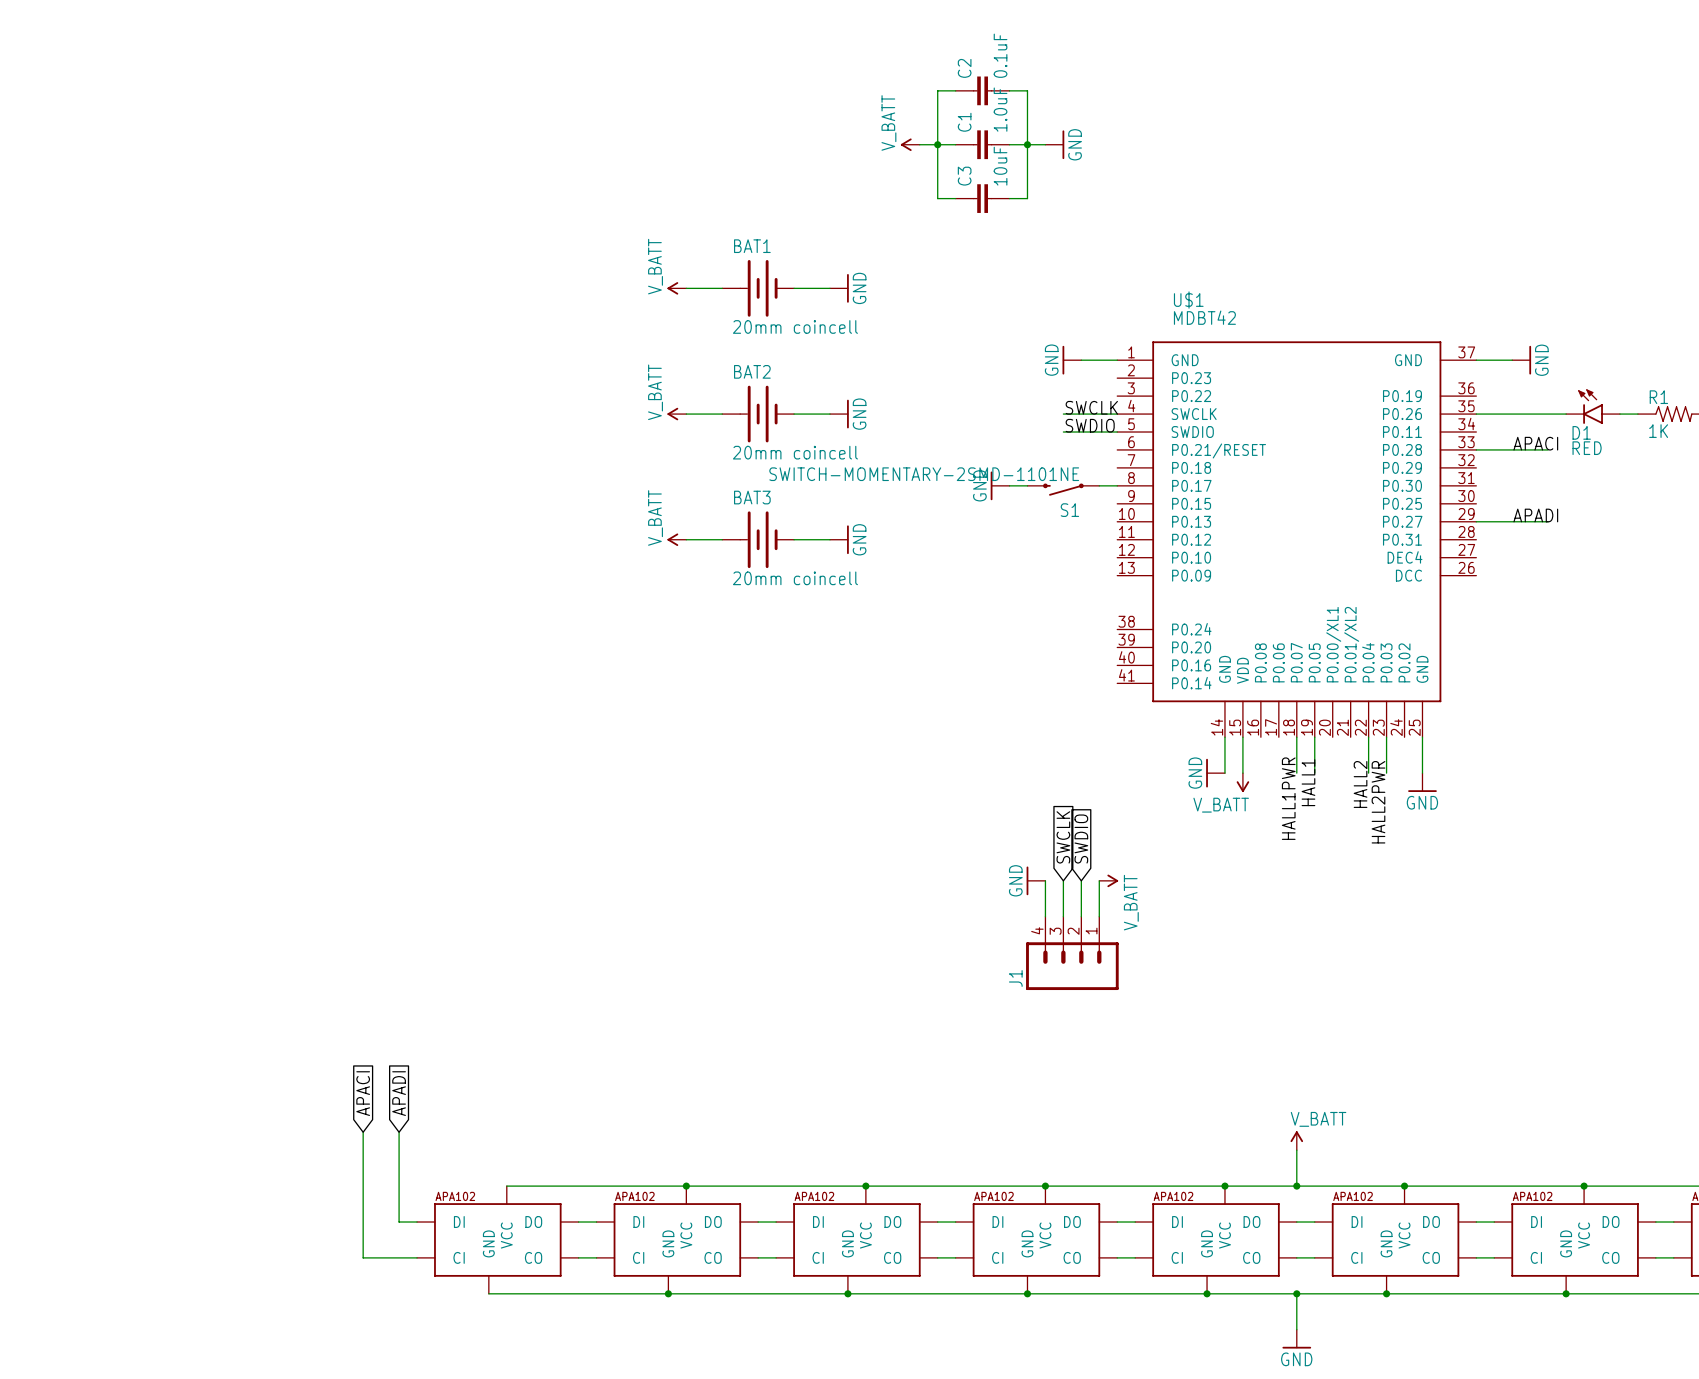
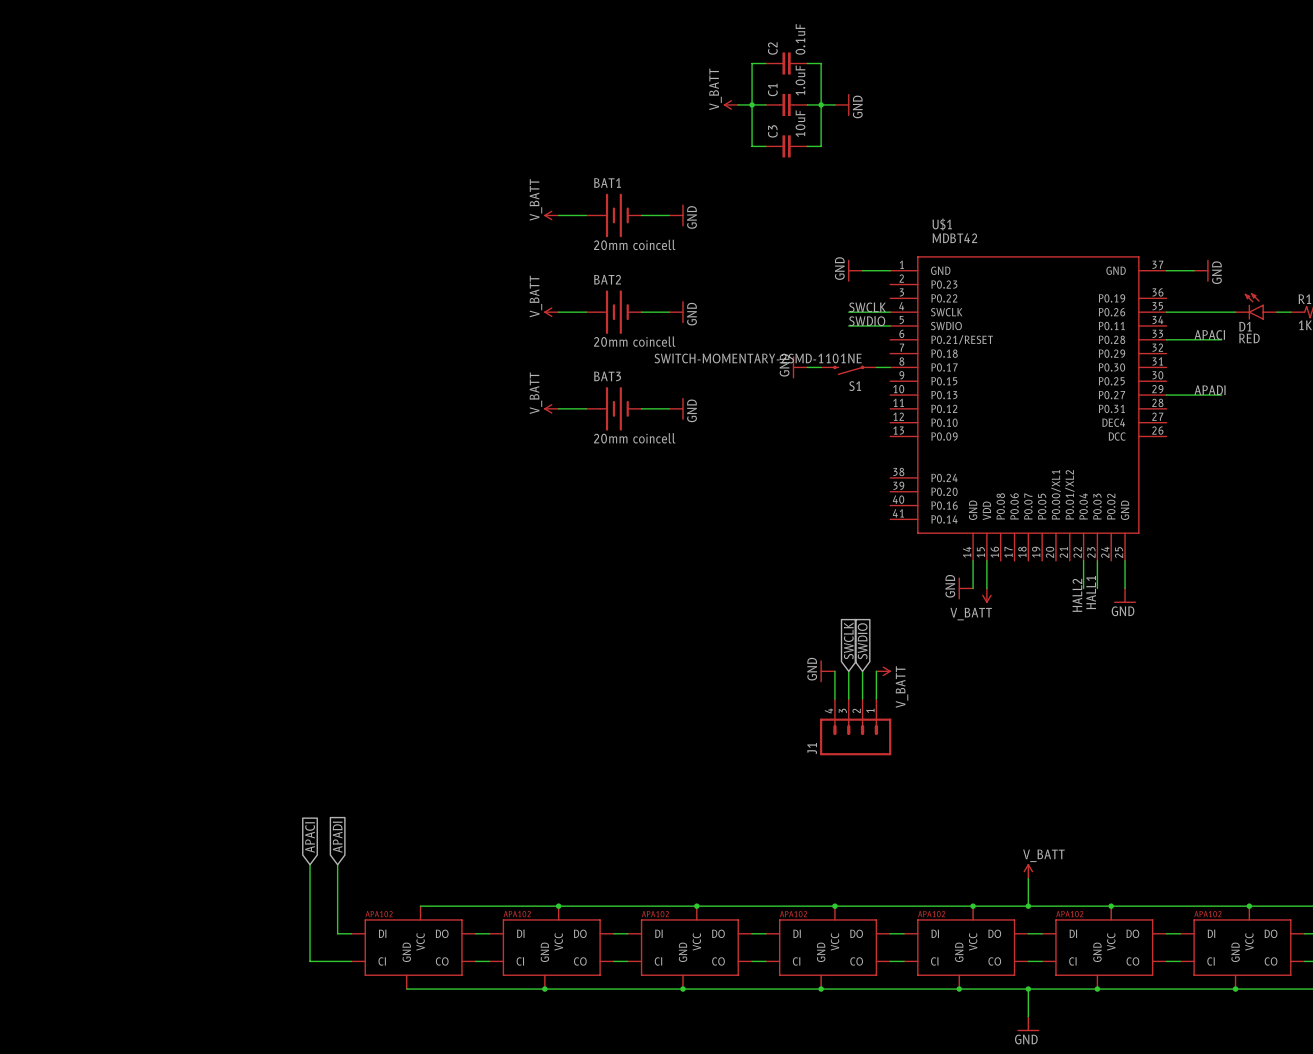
wire: (1296, 737) (1296, 773) -> none
wire: (1314, 737) (1314, 773) -> none
label: HALL1 (1308, 782) -> none
label: HALL1PWR (1288, 798) -> none
label: HALL2PWR (1378, 802) -> HALL1 (1091, 592)

